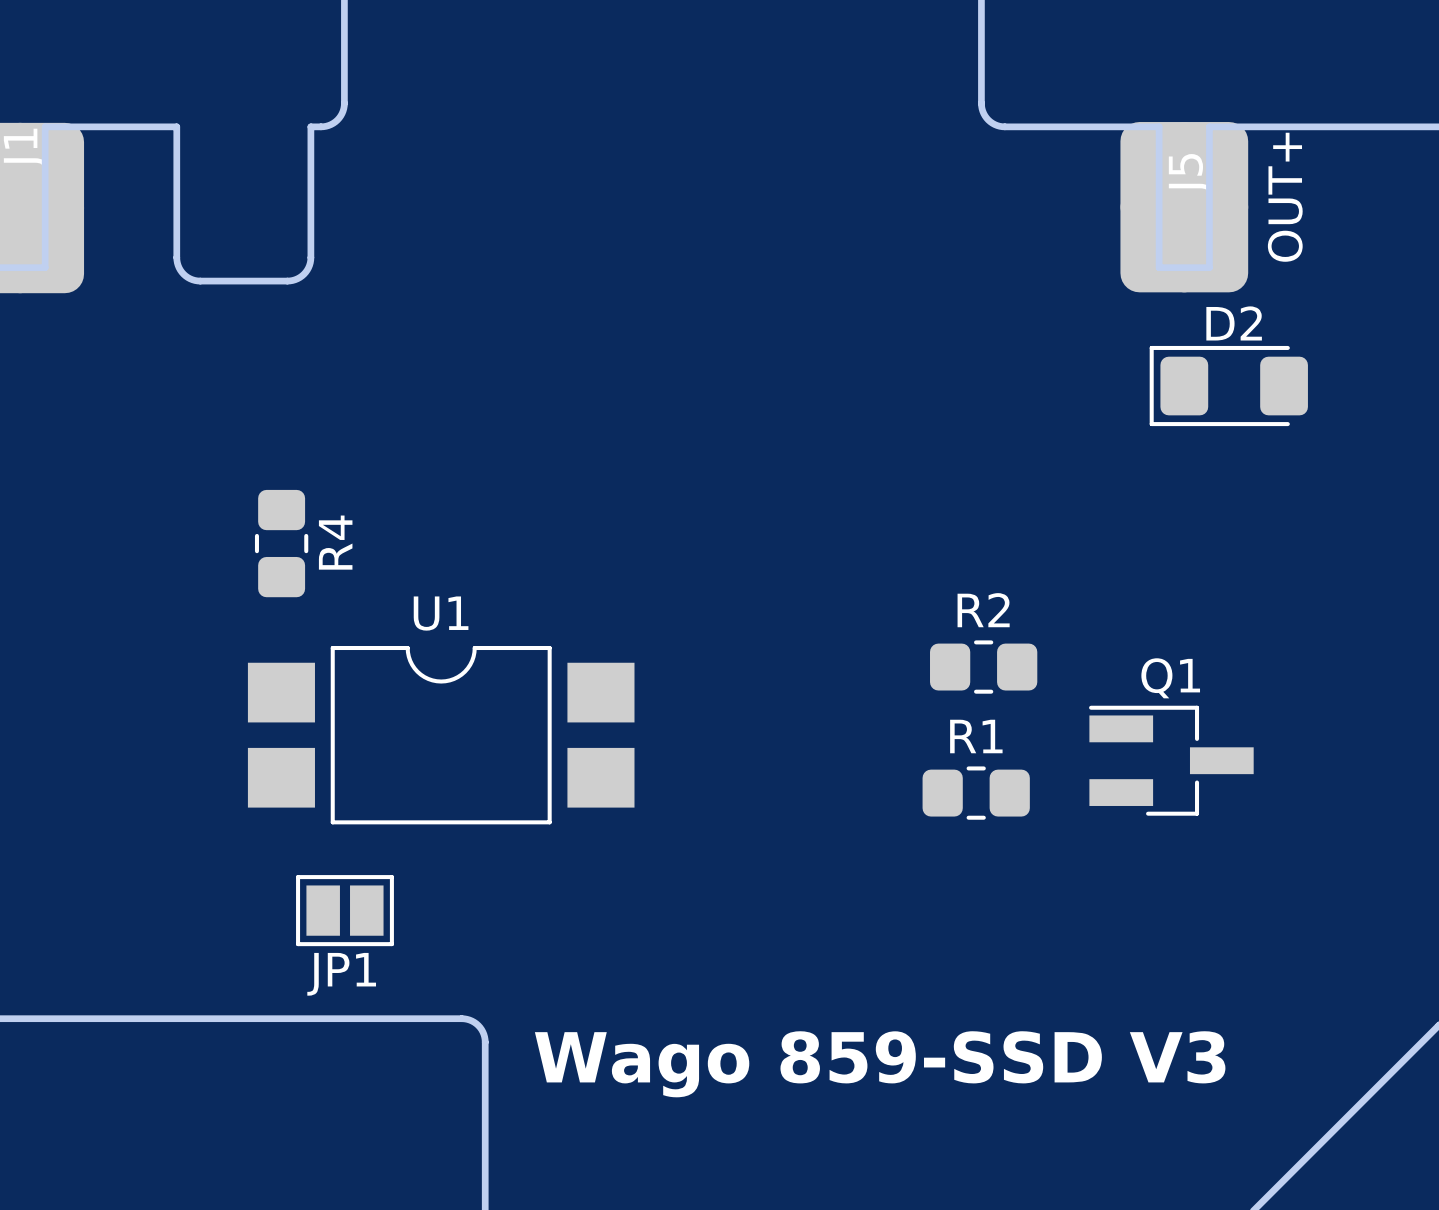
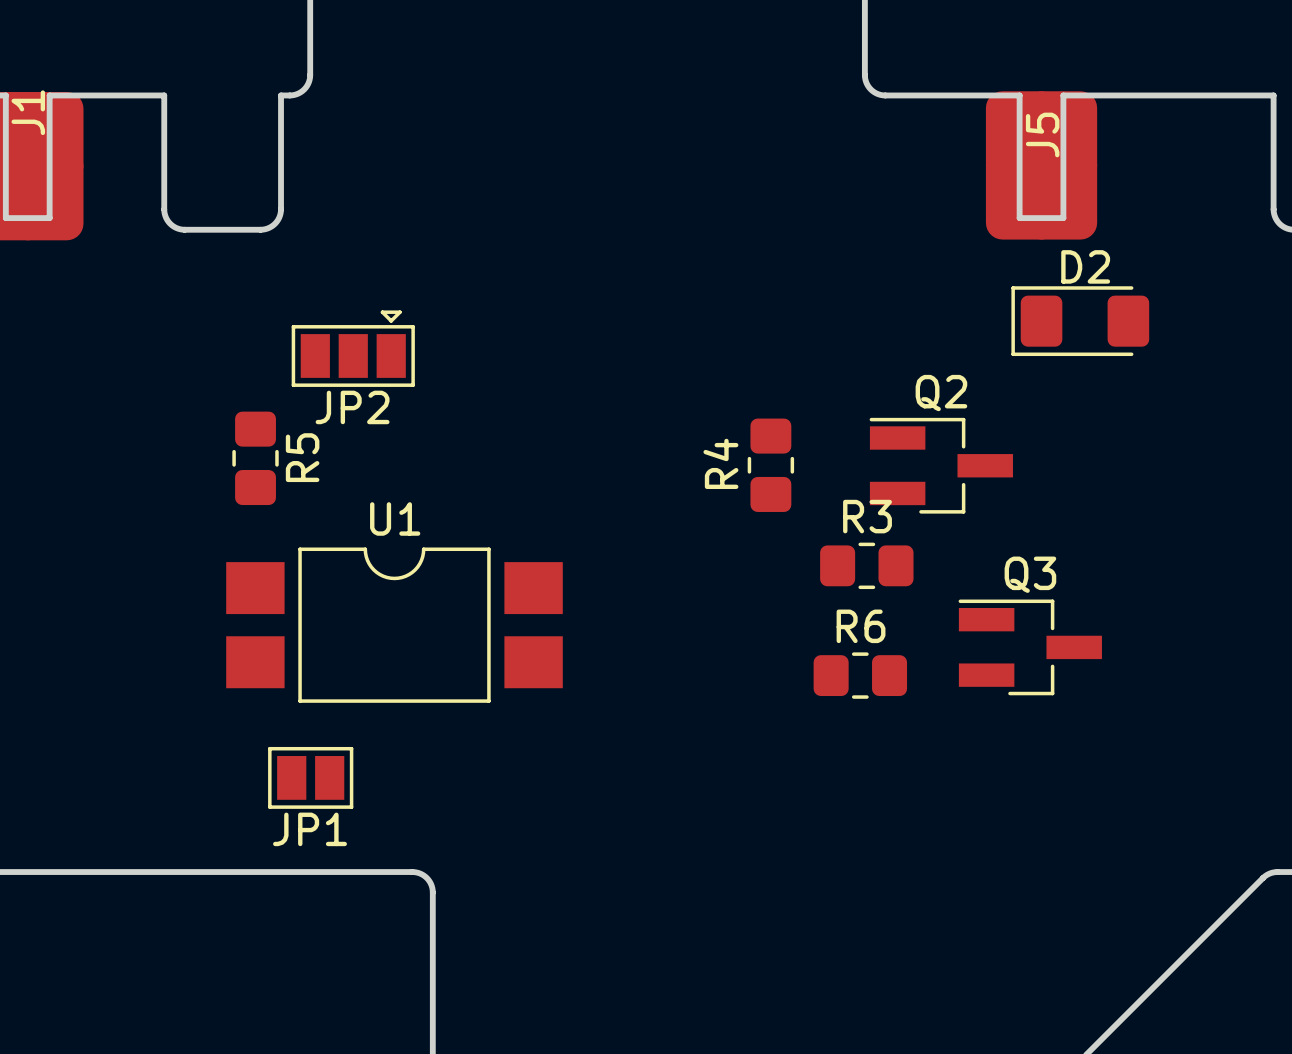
J5 value: OUT+ (1285, 197) -> none
JP2: none -> (353, 348)
R4 name: R4 (335, 542) -> R5 (302, 457)
R4: none -> (770, 465)
Q2: none -> (941, 465)
R2 name: R2 (983, 610) -> R3 (867, 516)
Q1 name: Q1 (1170, 678) -> Q3 (1030, 574)
R1 name: R1 (976, 736) -> R6 (861, 626)
text: Wago 859-SSD V3 (880, 1064) -> none

